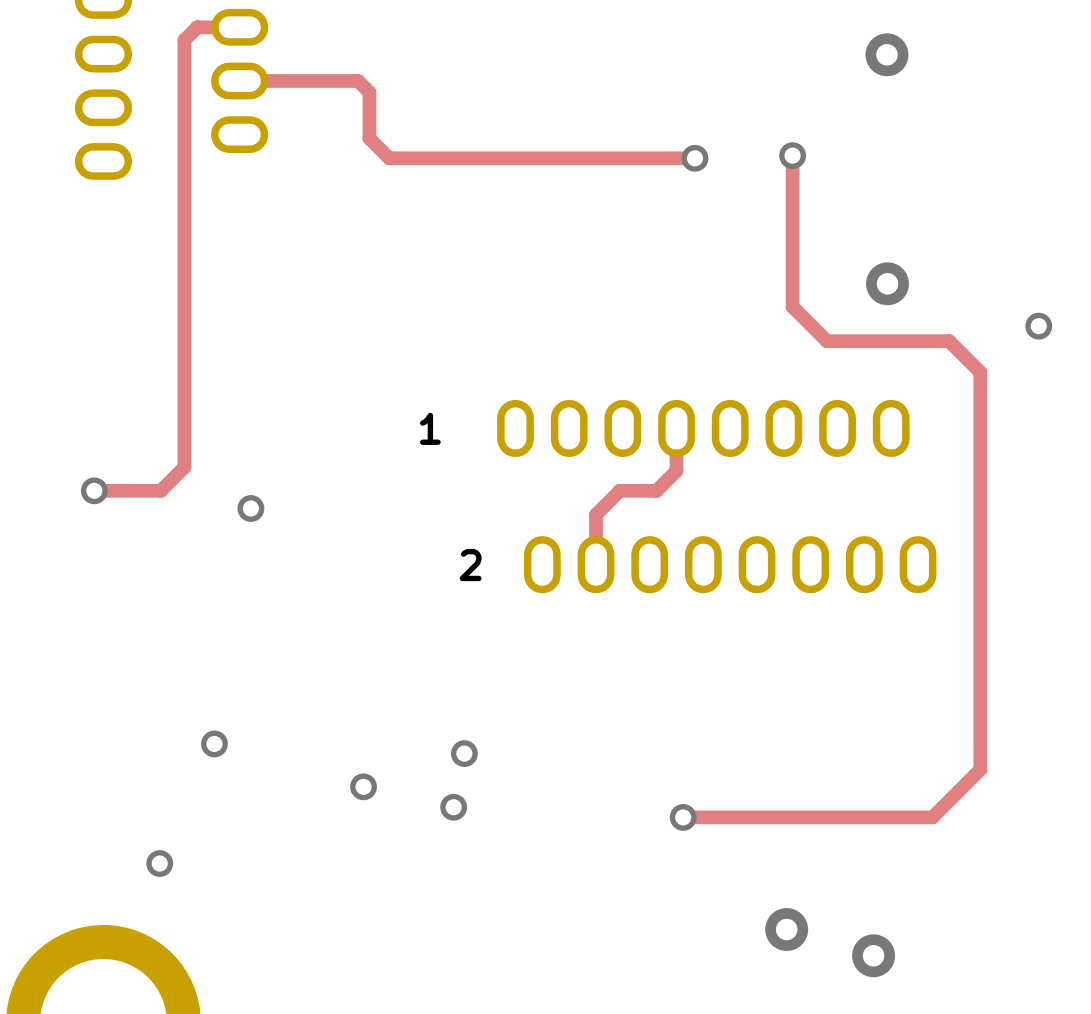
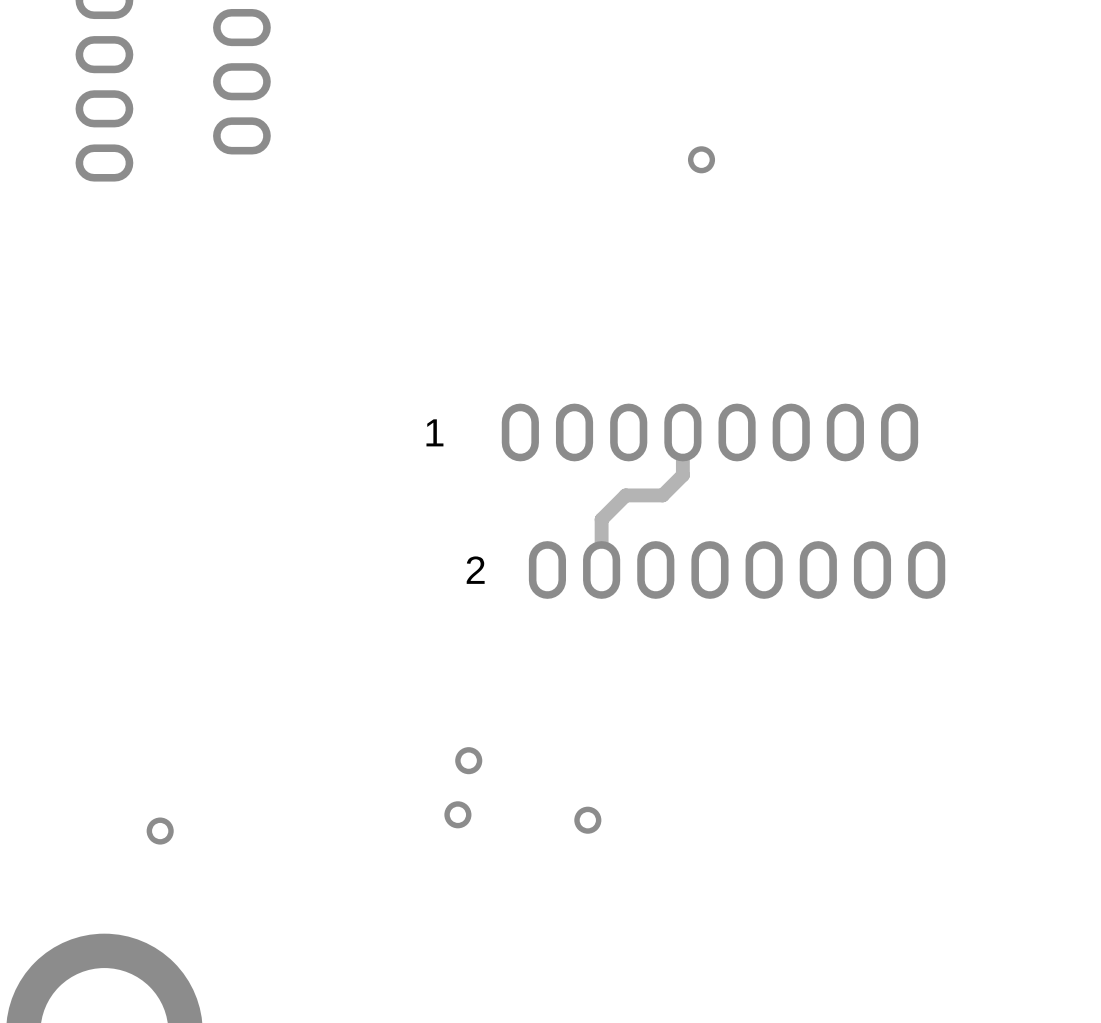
track: (239, 27) (197, 27) (184, 40) (184, 467) (160, 490) (94, 490) -> none
via: (886, 54) -> none
track: (239, 80) (358, 80) (369, 92) (369, 138) (389, 158) (694, 158) -> none
track: (792, 155) (792, 306) (826, 341) (949, 341) (980, 372) (980, 769) (932, 817) (683, 817) -> none
via: (792, 155) -> none
via: (887, 283) -> none
via: (1038, 326) -> none
via: (94, 490) -> none
via: (250, 508) -> none
via: (214, 743) -> none
via: (363, 786) -> none
via position: (683, 817) -> (587, 820)
via position: (159, 863) -> (160, 831)
via: (786, 929) -> none
via: (873, 955) -> none

